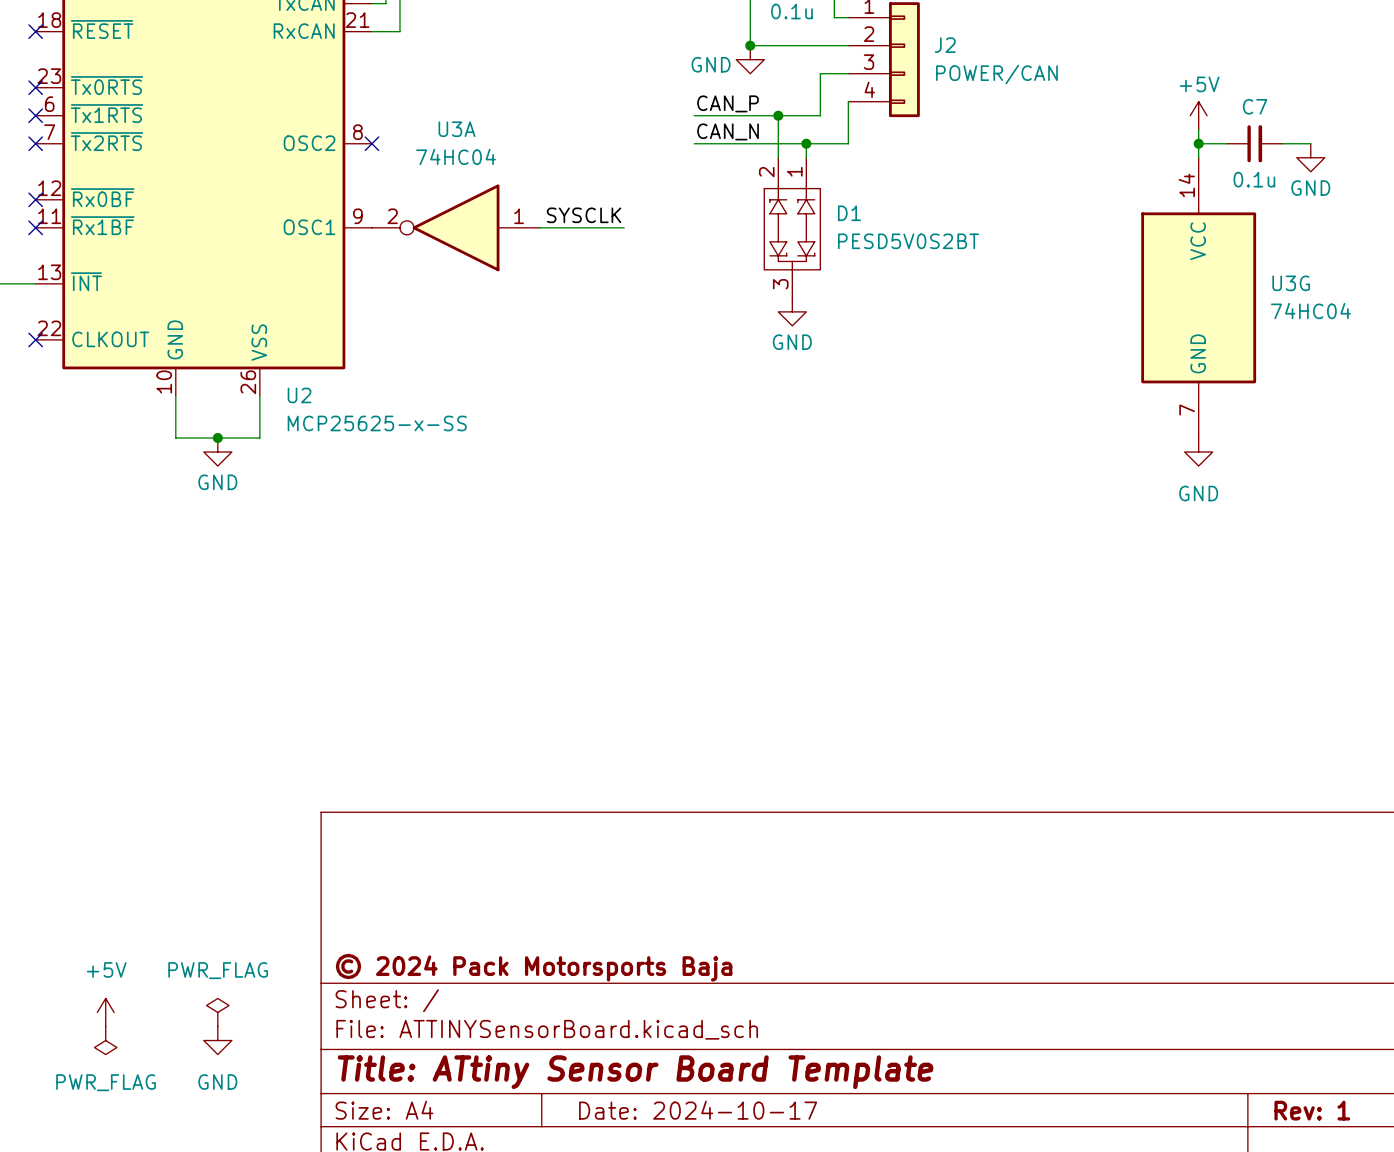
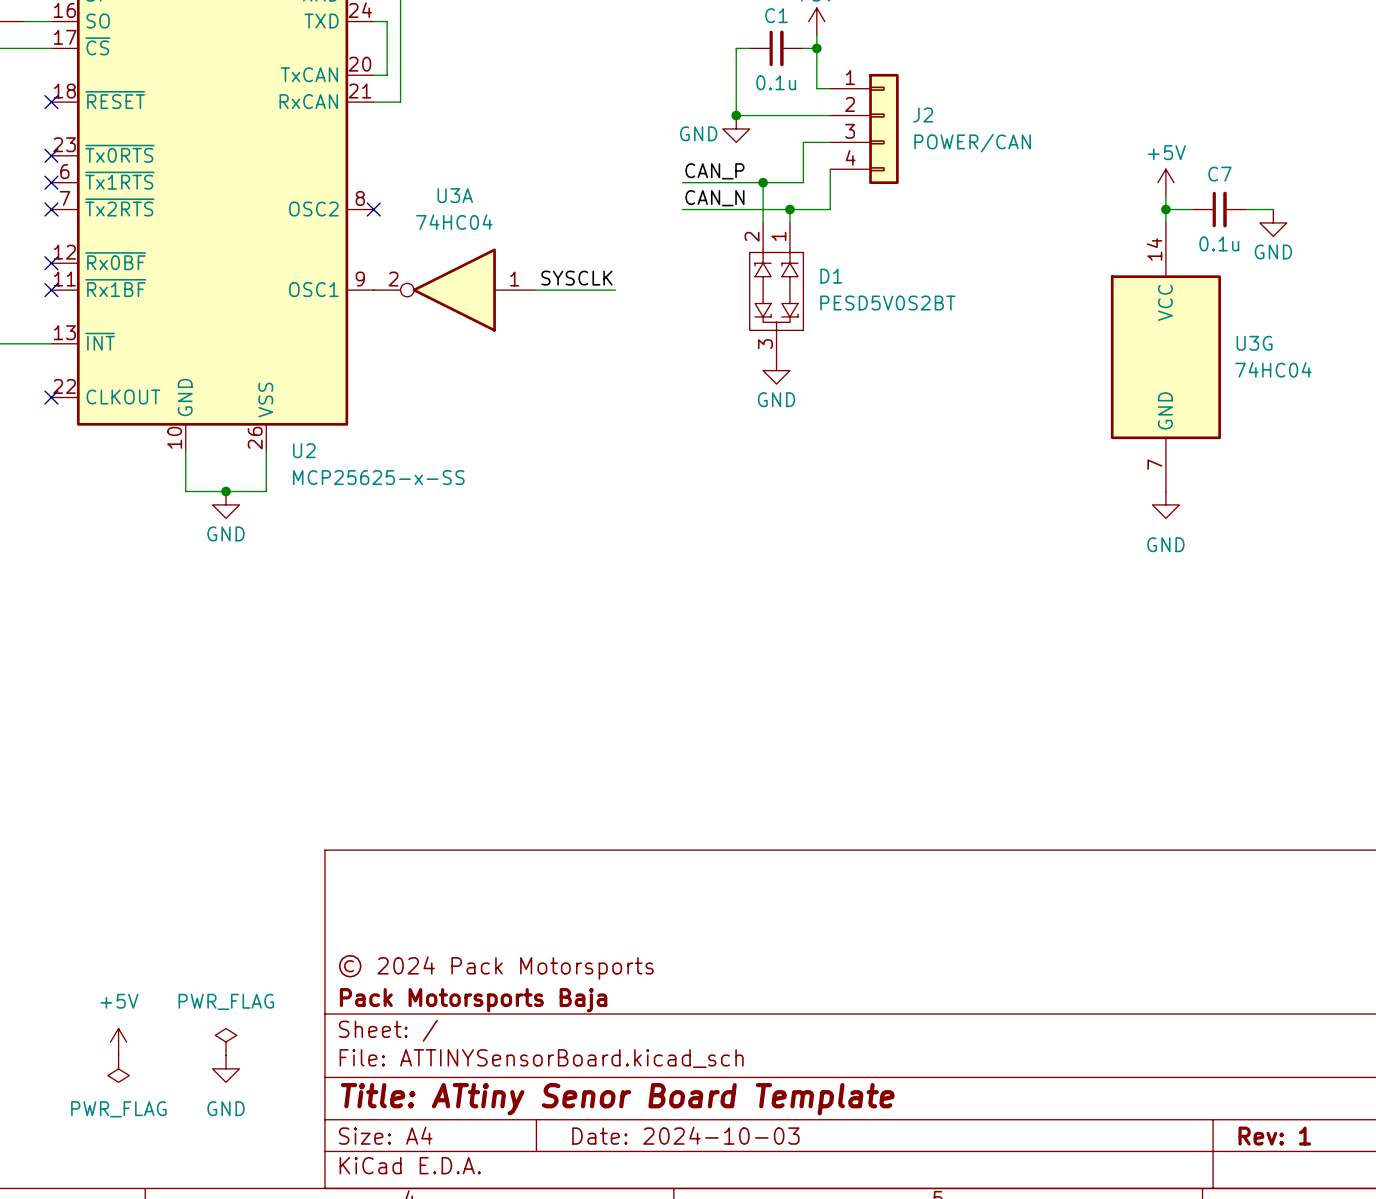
title block: none -> ©️ 2024 Pack Motorsports (496, 967)
title block: ©️ 2024 Pack Motorsports Baja (534, 967) -> Pack Motorsports Baja (473, 1000)
title block: Title: ATtiny Sensor Board Template (635, 1072) -> Title: ATtiny Senor Board Template (617, 1099)
title block: Date: 2024-10-17 (698, 1110) -> Date: 2024-10-03 (685, 1135)

